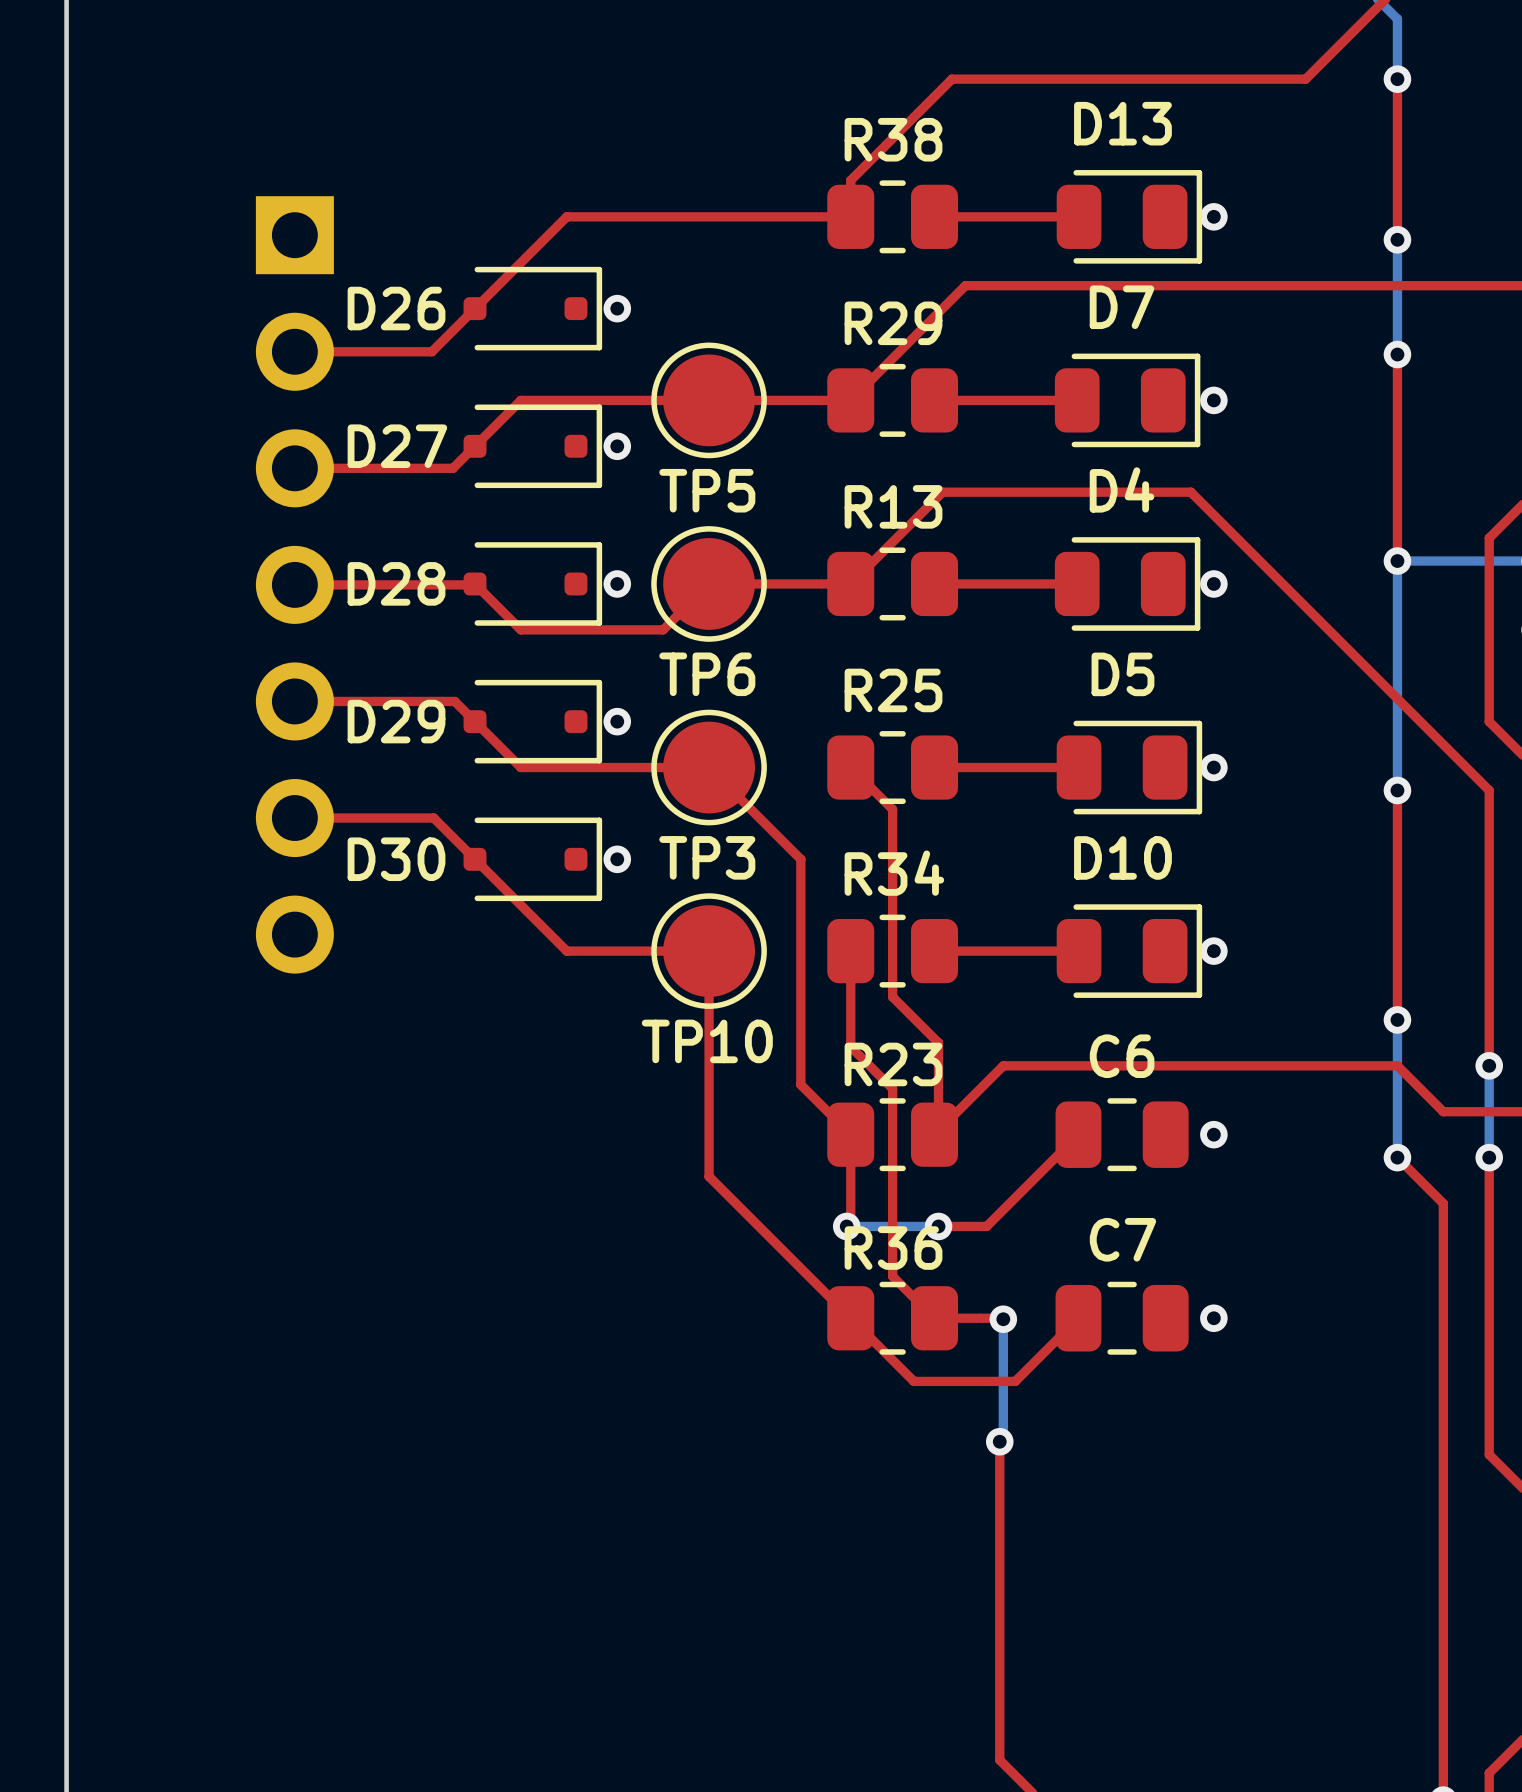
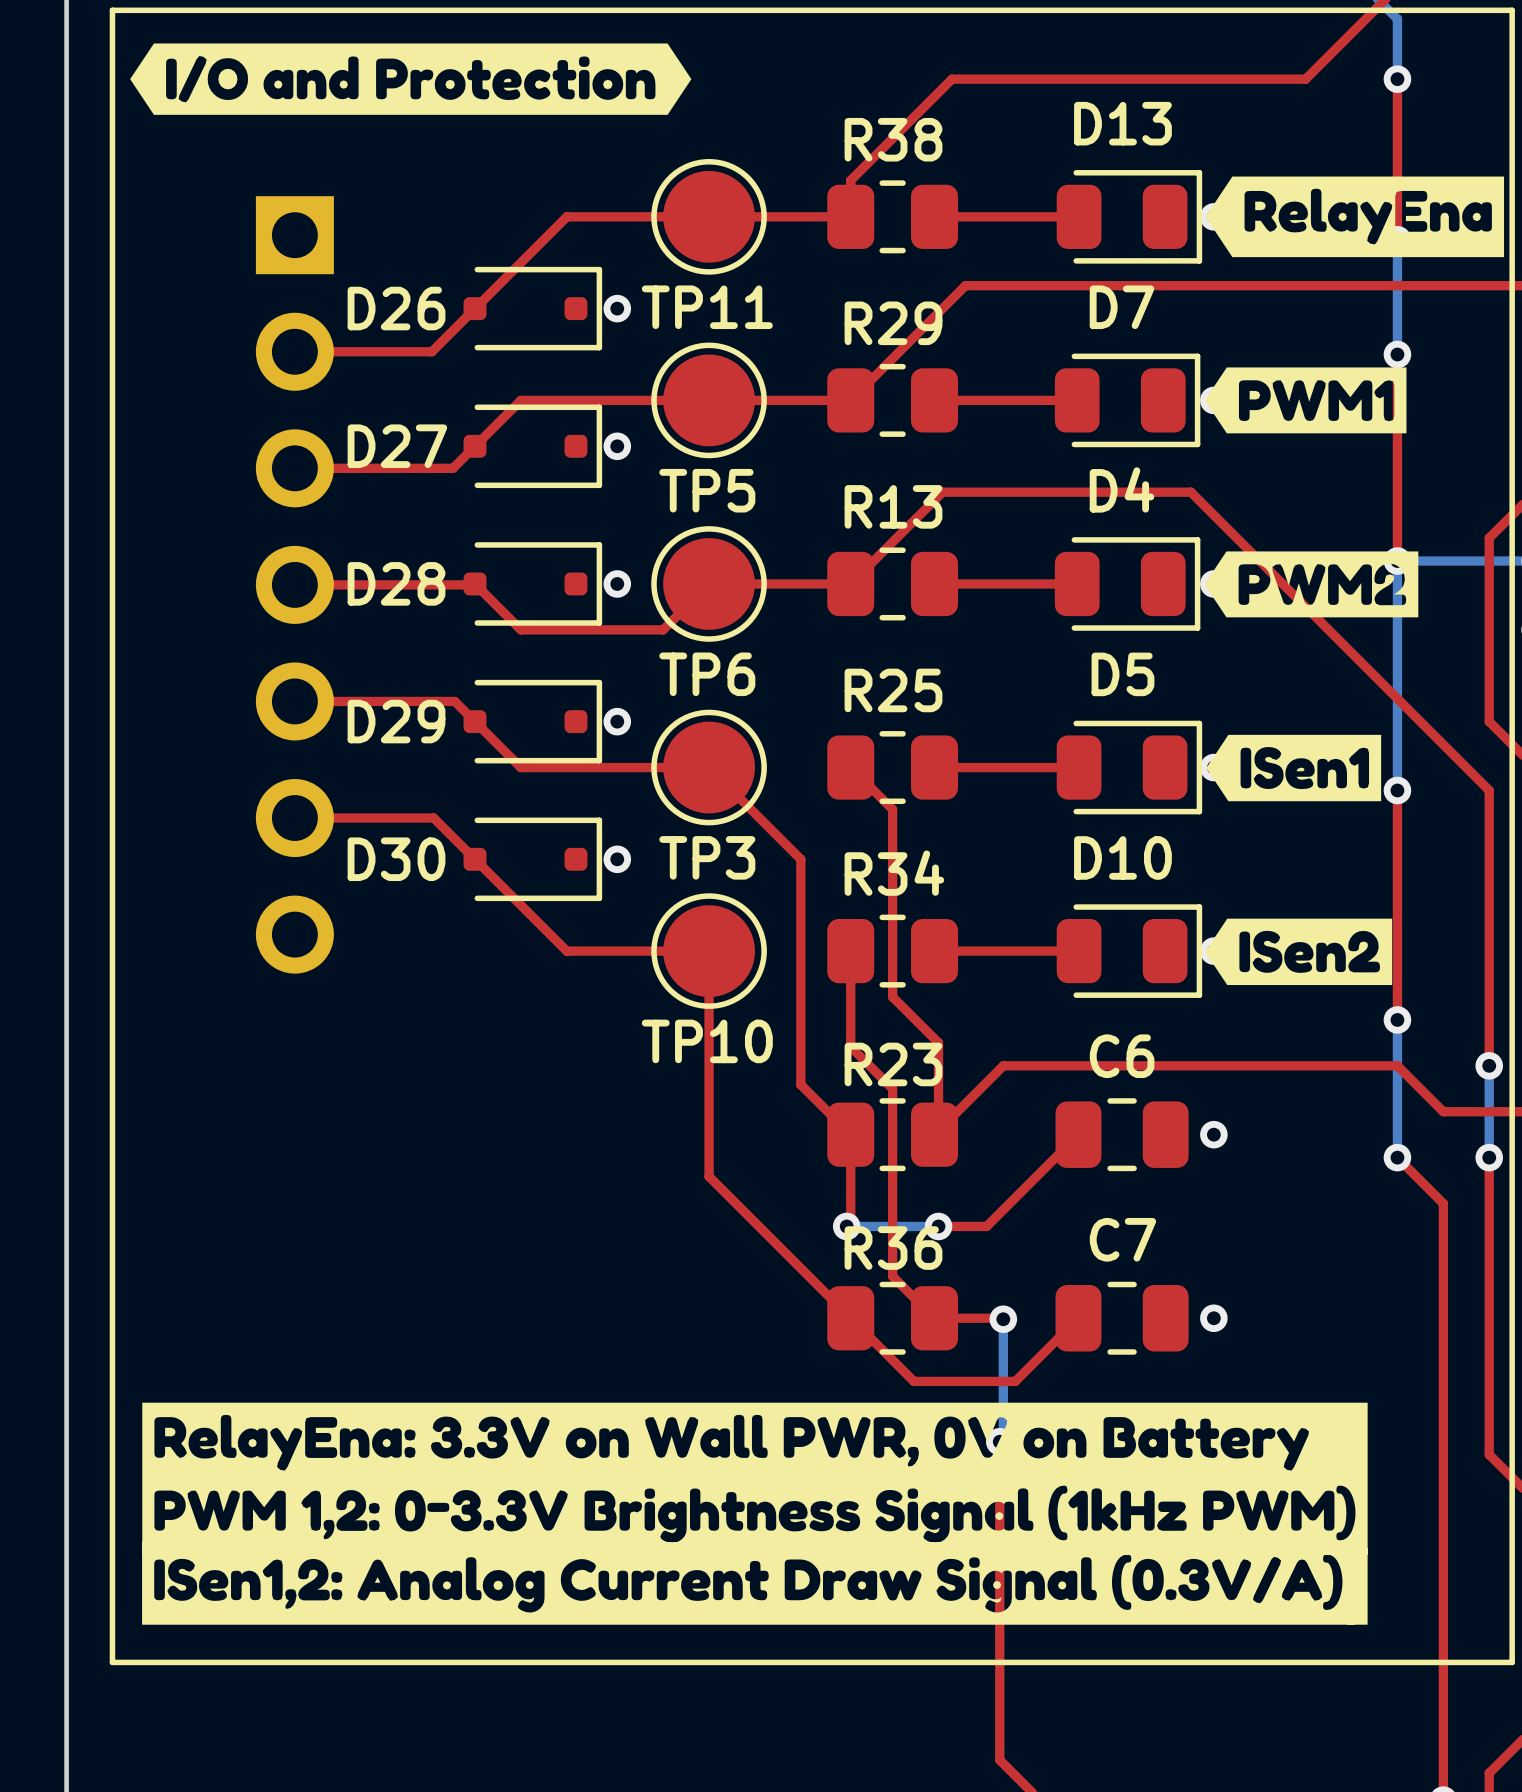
line: none -> (112, 10) (1512, 10) (1512, 1662) (112, 1662) (112, 10)
drawing: none -> [130, 43, 692, 115]
drawing: none -> [1205, 176, 1505, 258]
TP11: none -> (709, 216)
drawing: none -> [1204, 367, 1407, 434]
drawing: none -> [1204, 551, 1419, 618]
drawing: none -> [1206, 734, 1382, 802]
drawing: none -> [1205, 918, 1393, 986]
drawing: none -> [142, 1402, 1368, 1625]

